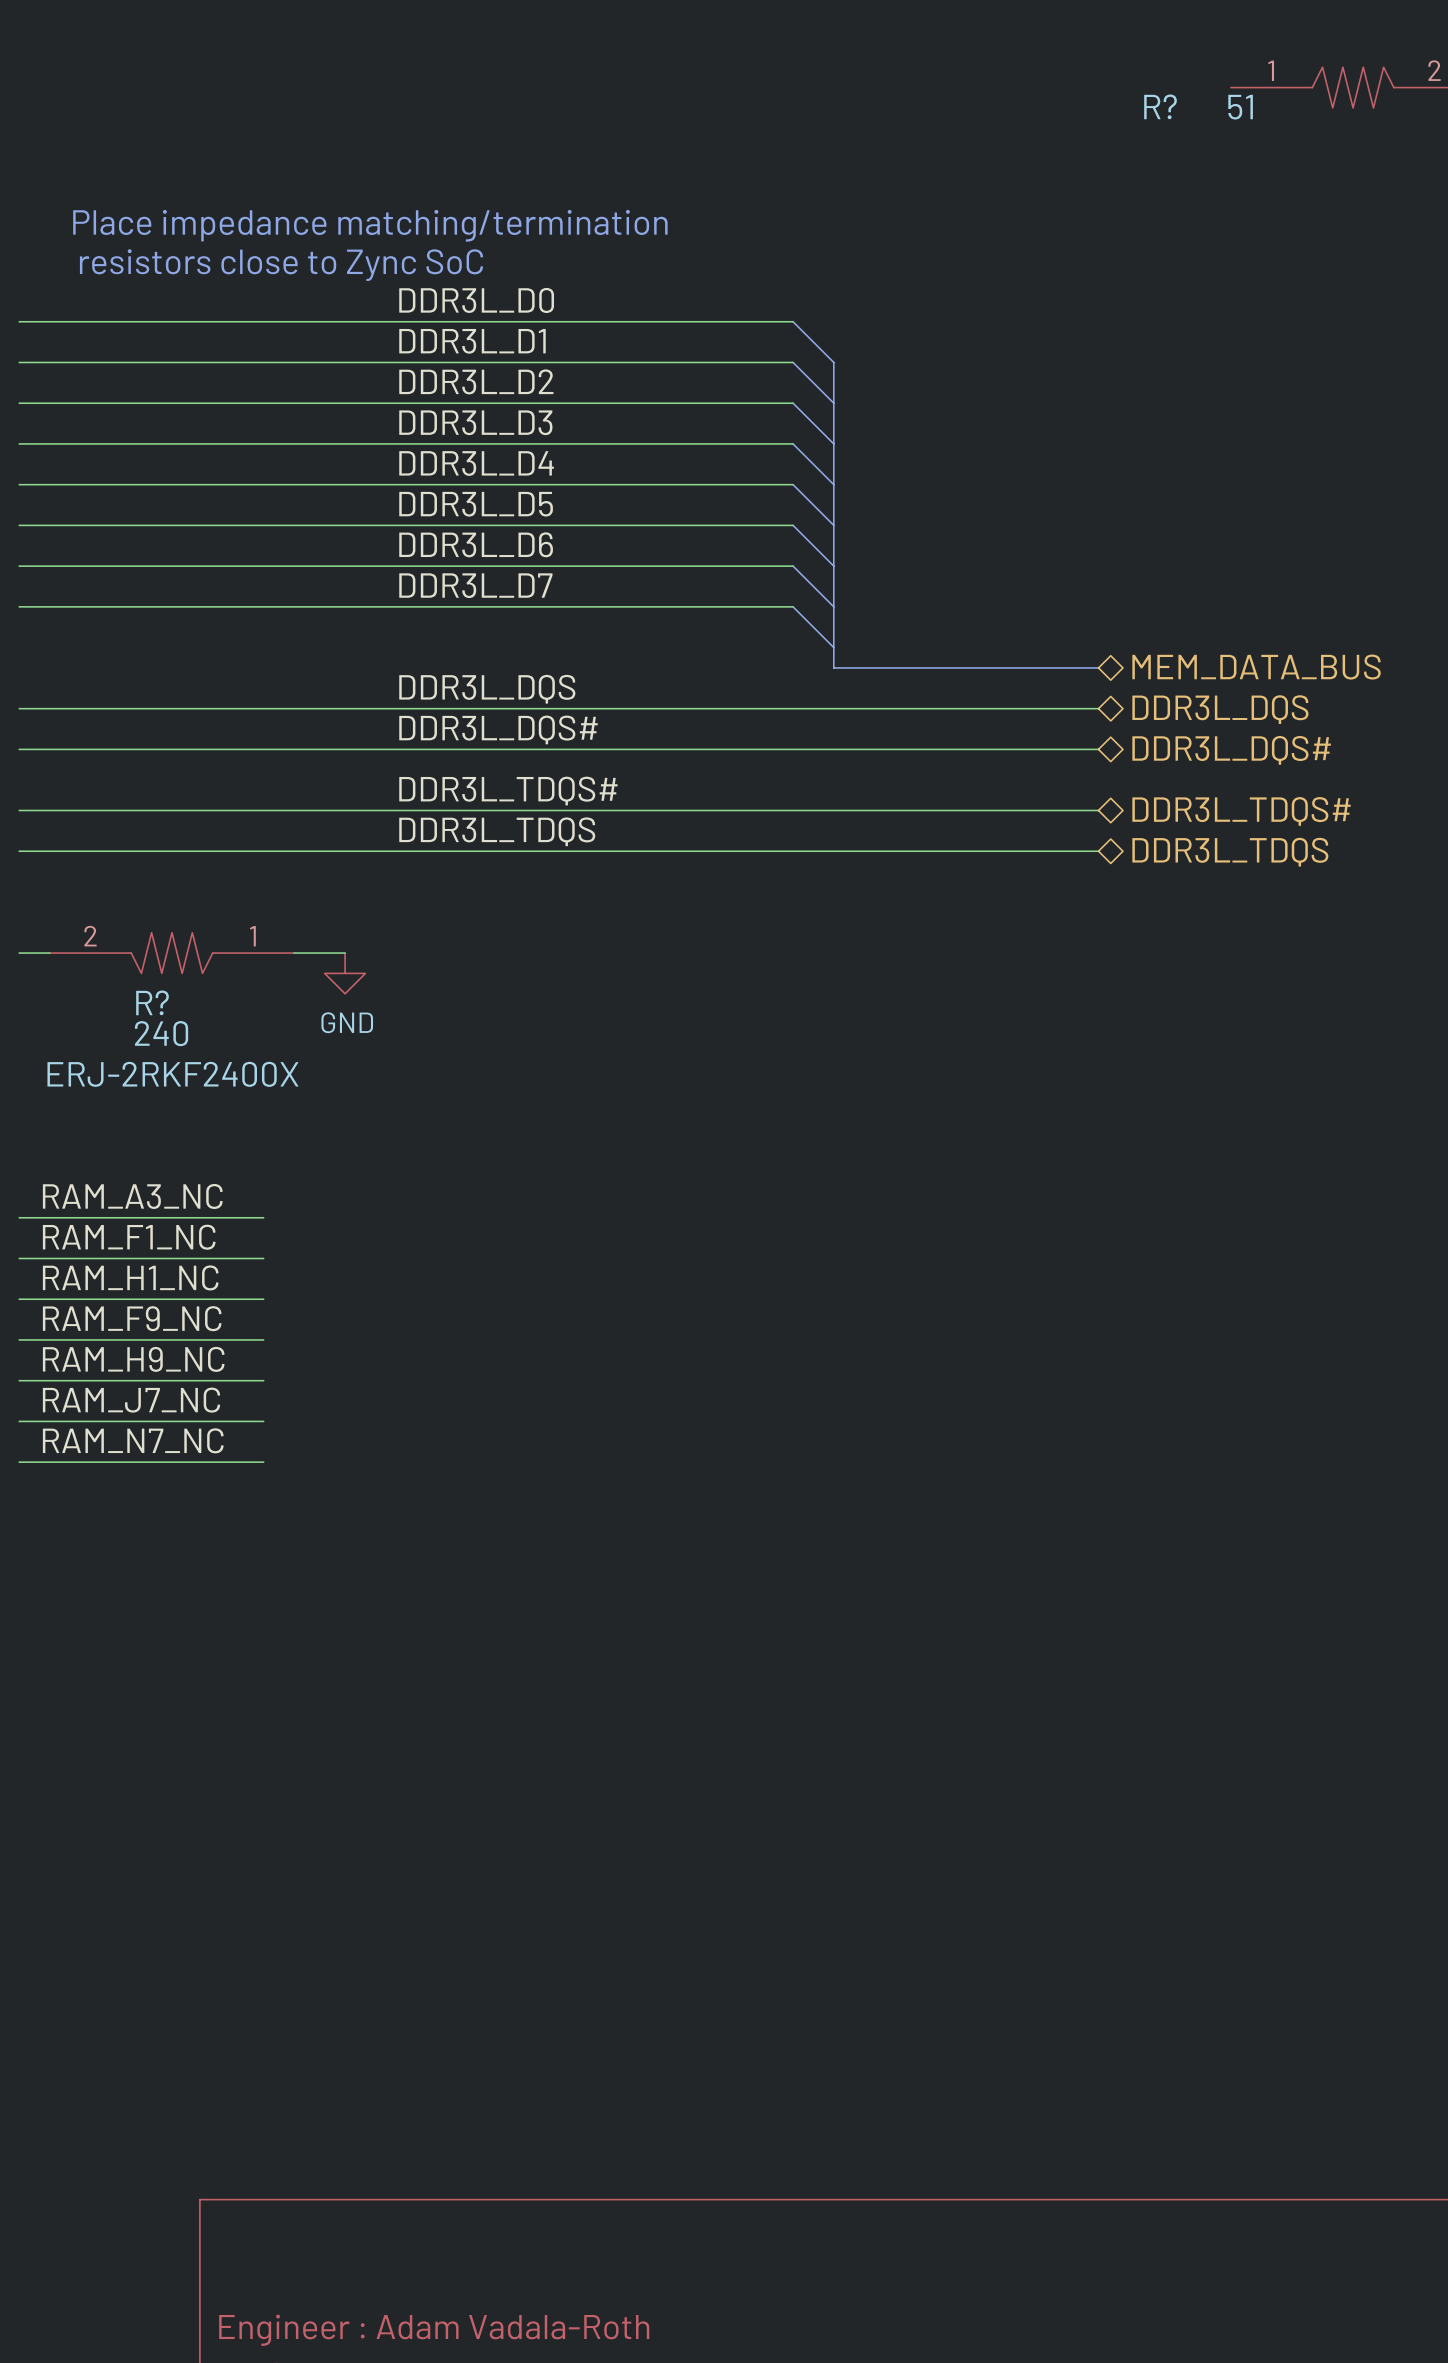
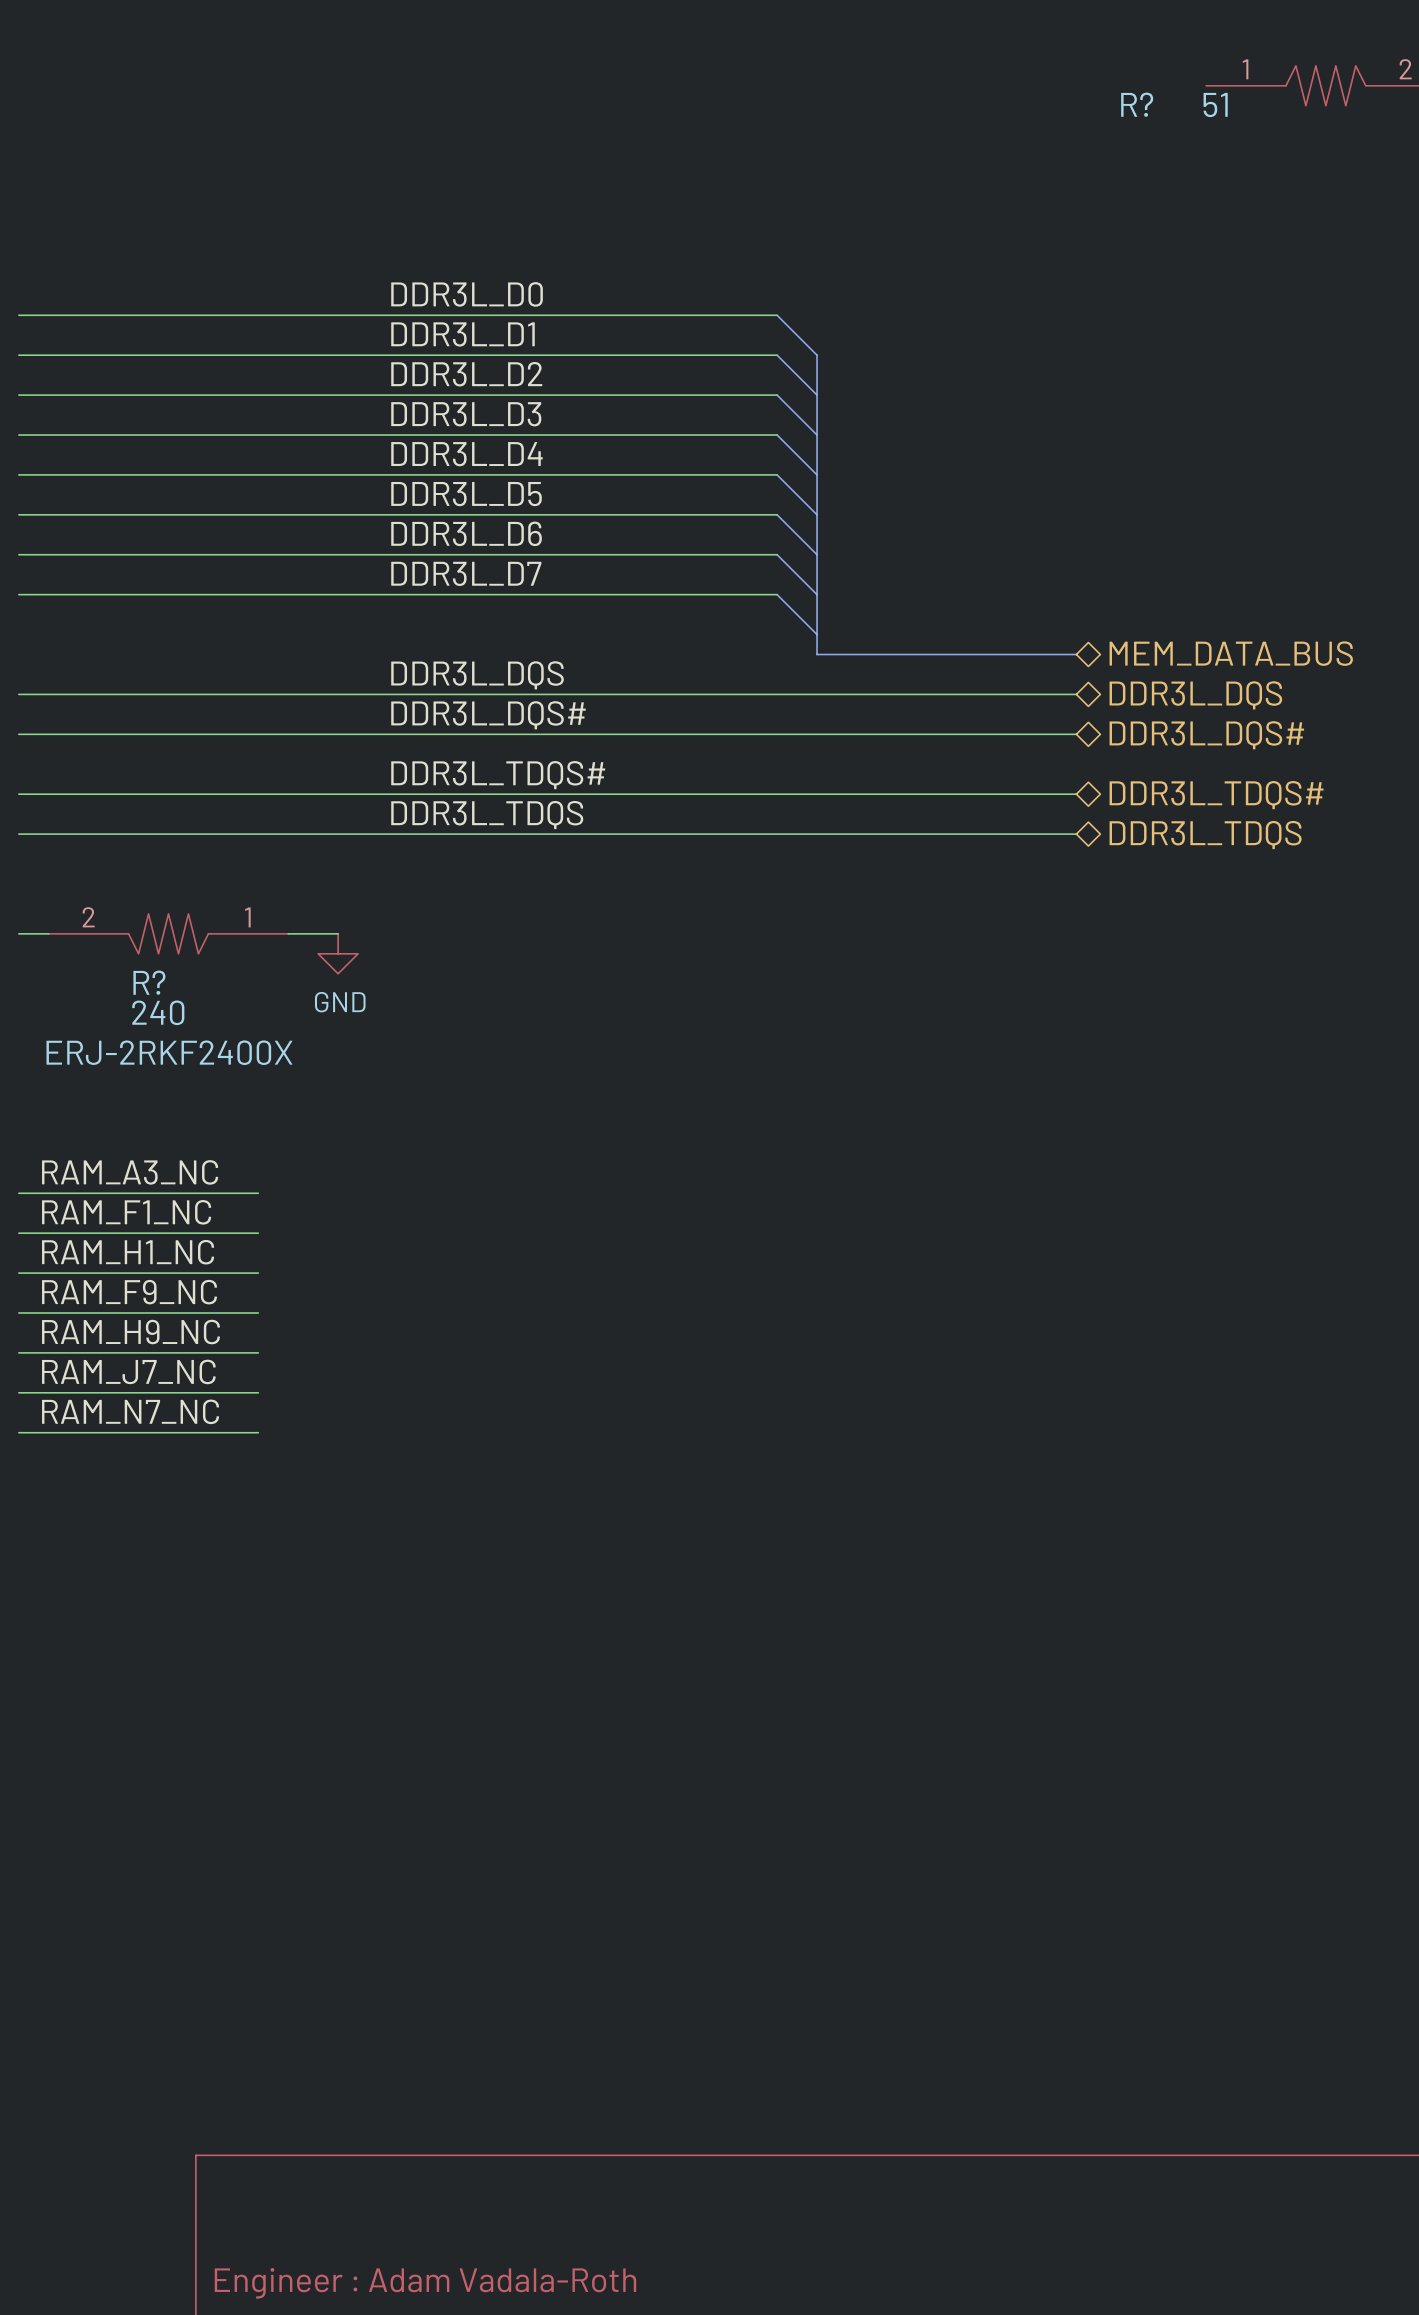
text: Place impedance matching/termination (370, 225) -> none
text: resistors close to Zync SoC (281, 265) -> none

